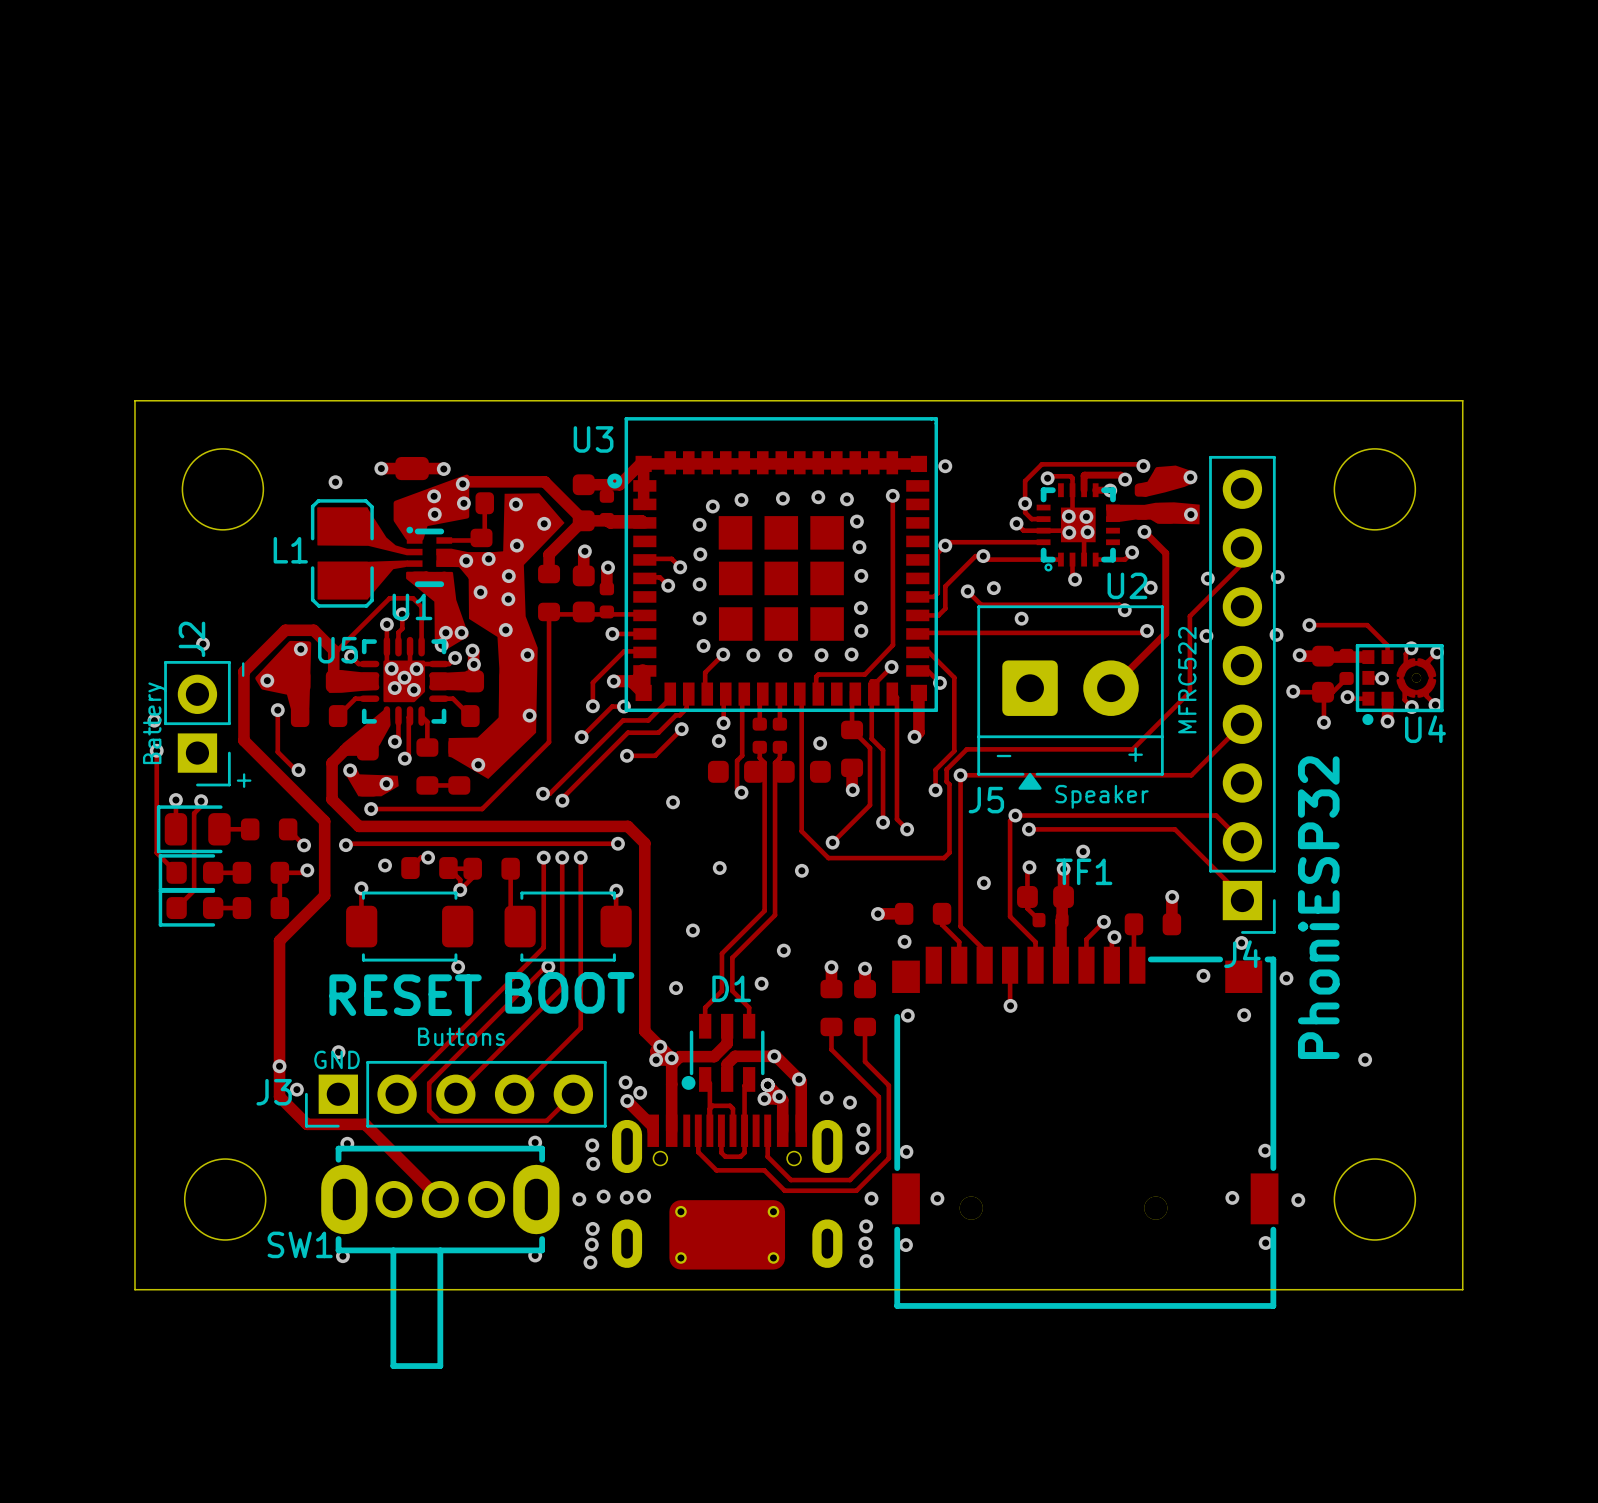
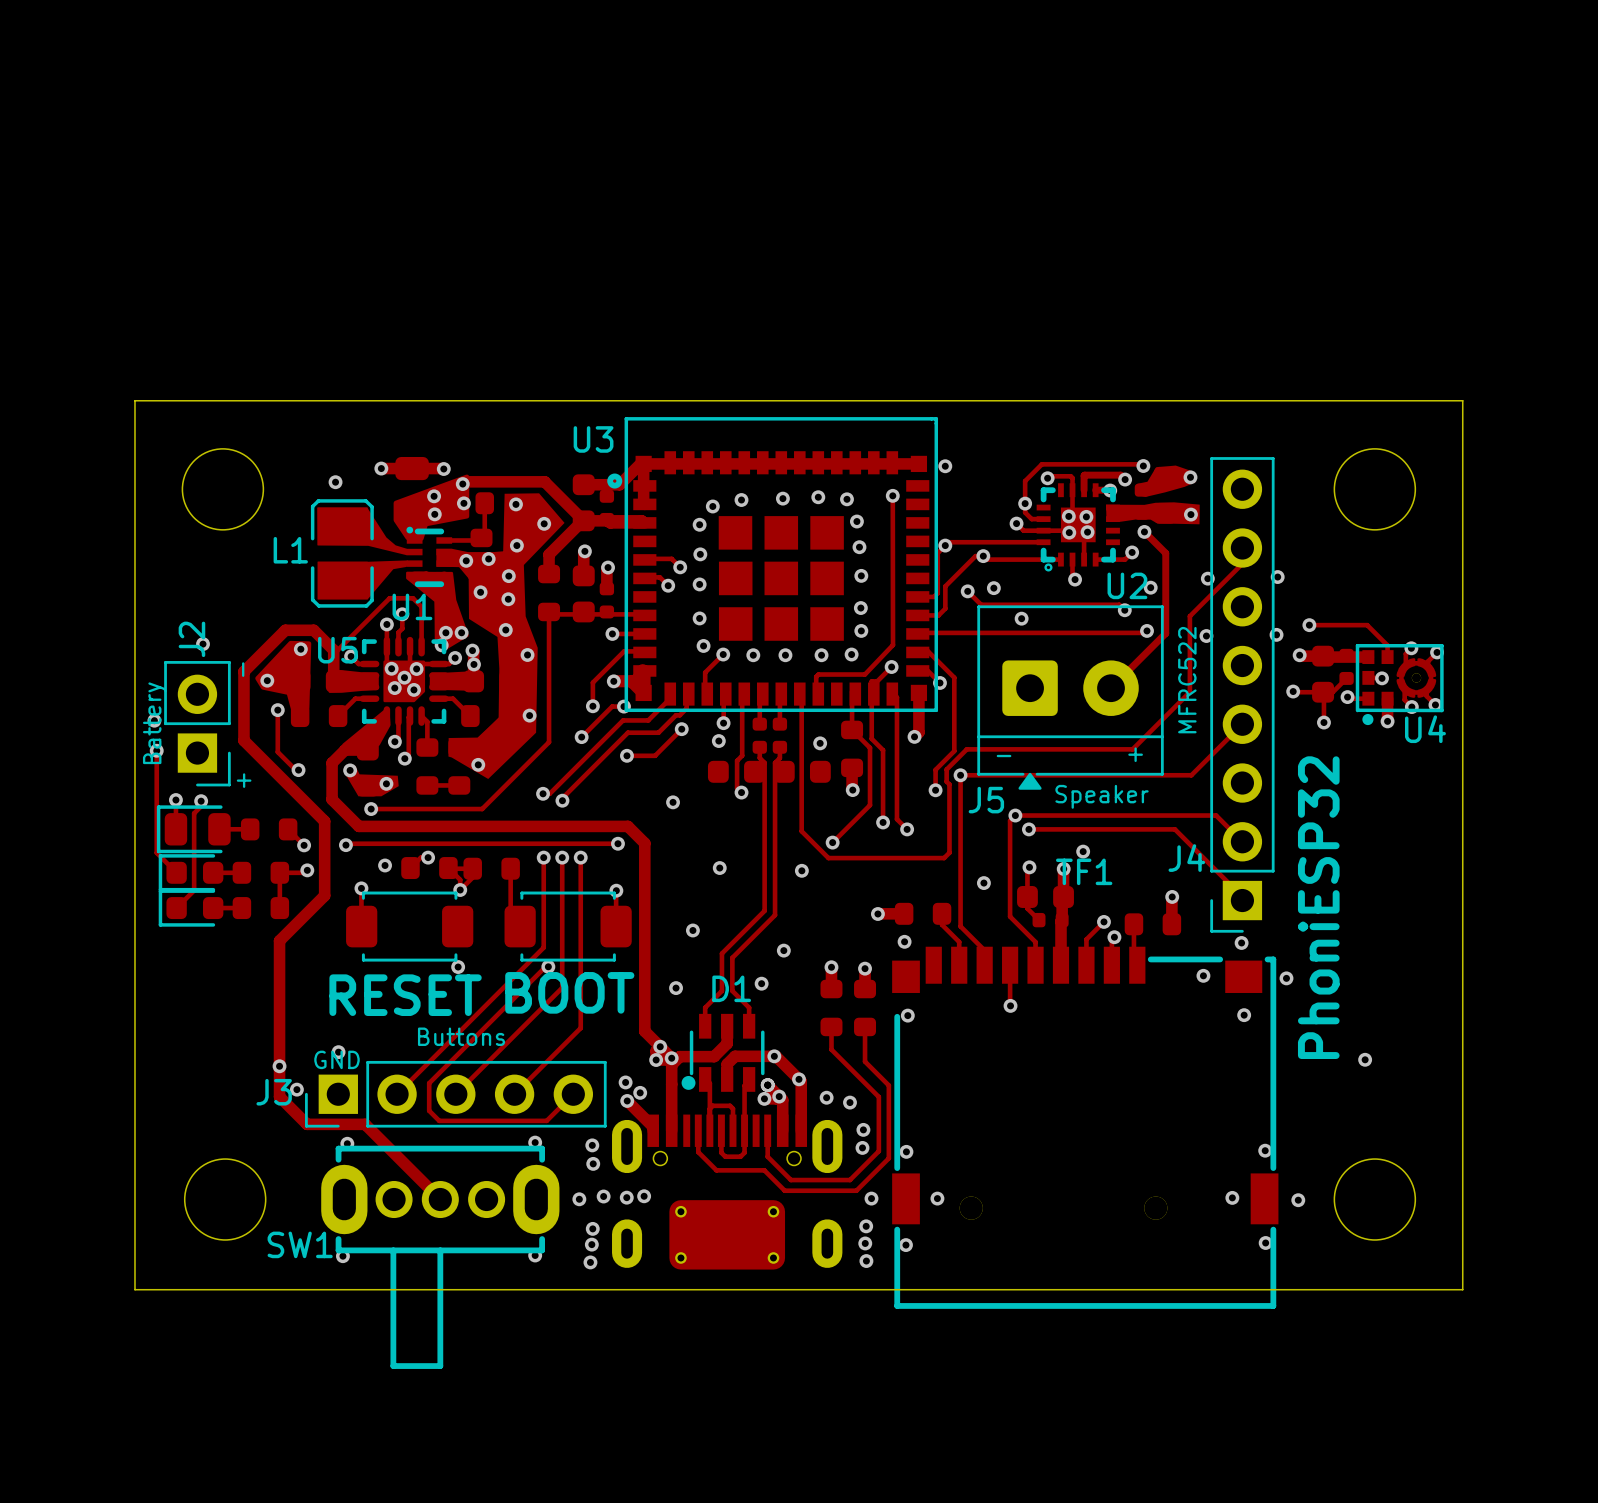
J4 footprint: [1209, 455, 1276, 934] -> [1210, 457, 1275, 933]
J4 name position: J4 (1242, 954) -> J4 (1186, 858)

